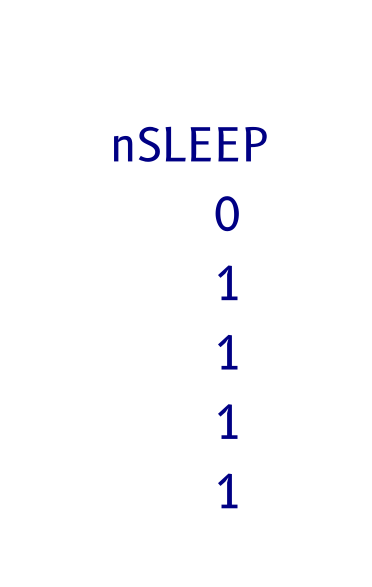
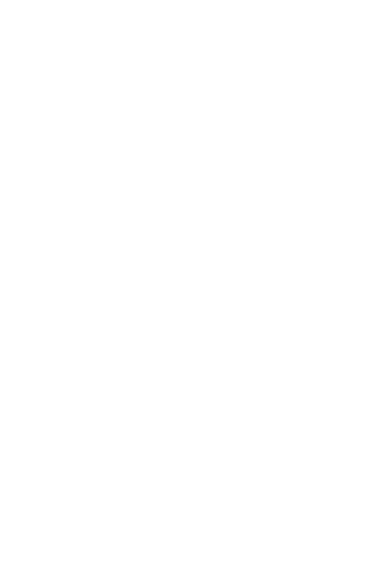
text: nSLEEP (190, 144) -> none
text: 0 (227, 213) -> none
text: 1 (227, 282) -> none
text: 1 (227, 352) -> none
text: 1 (227, 421) -> none
text: 1 (227, 490) -> none

